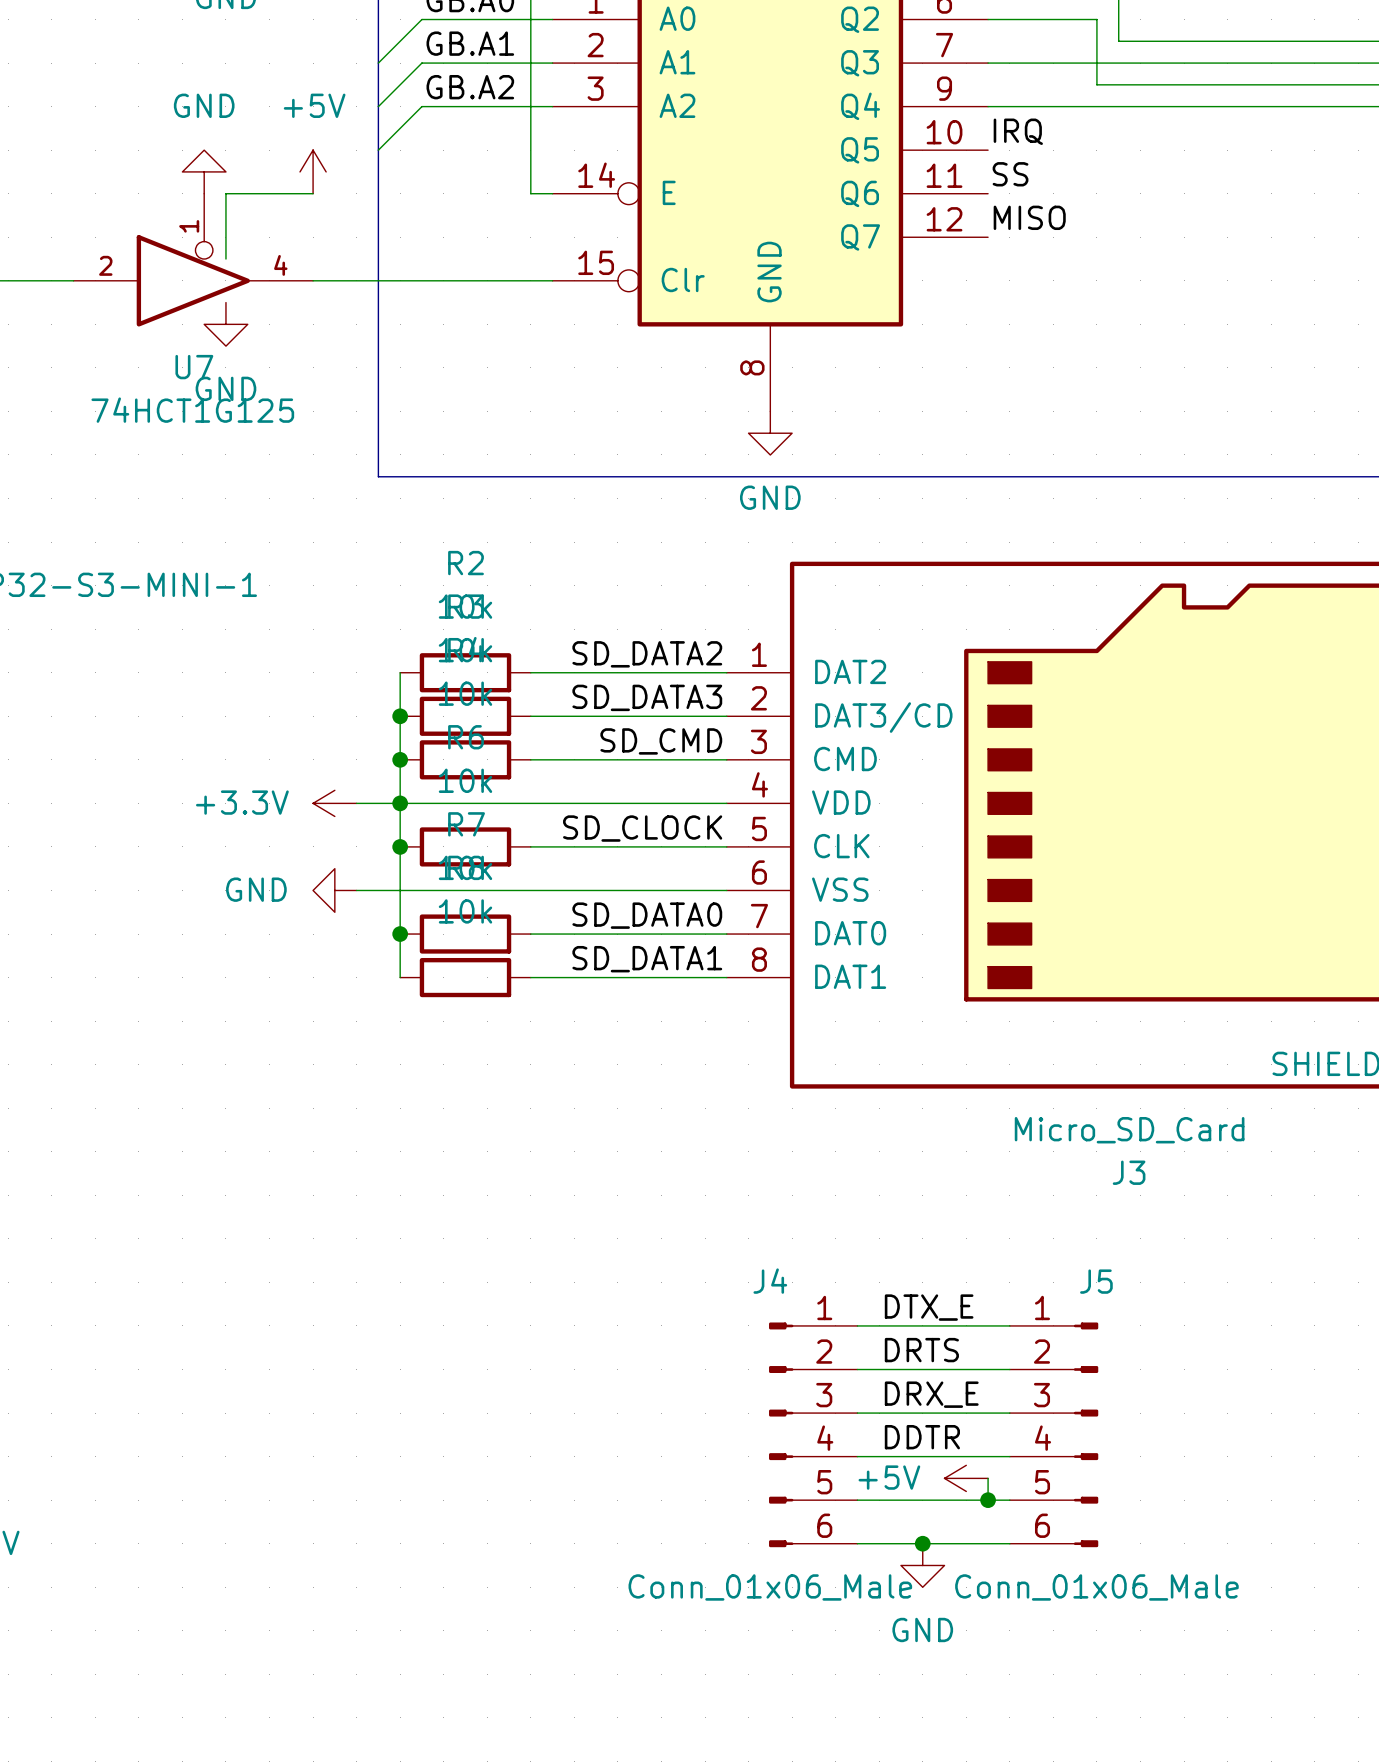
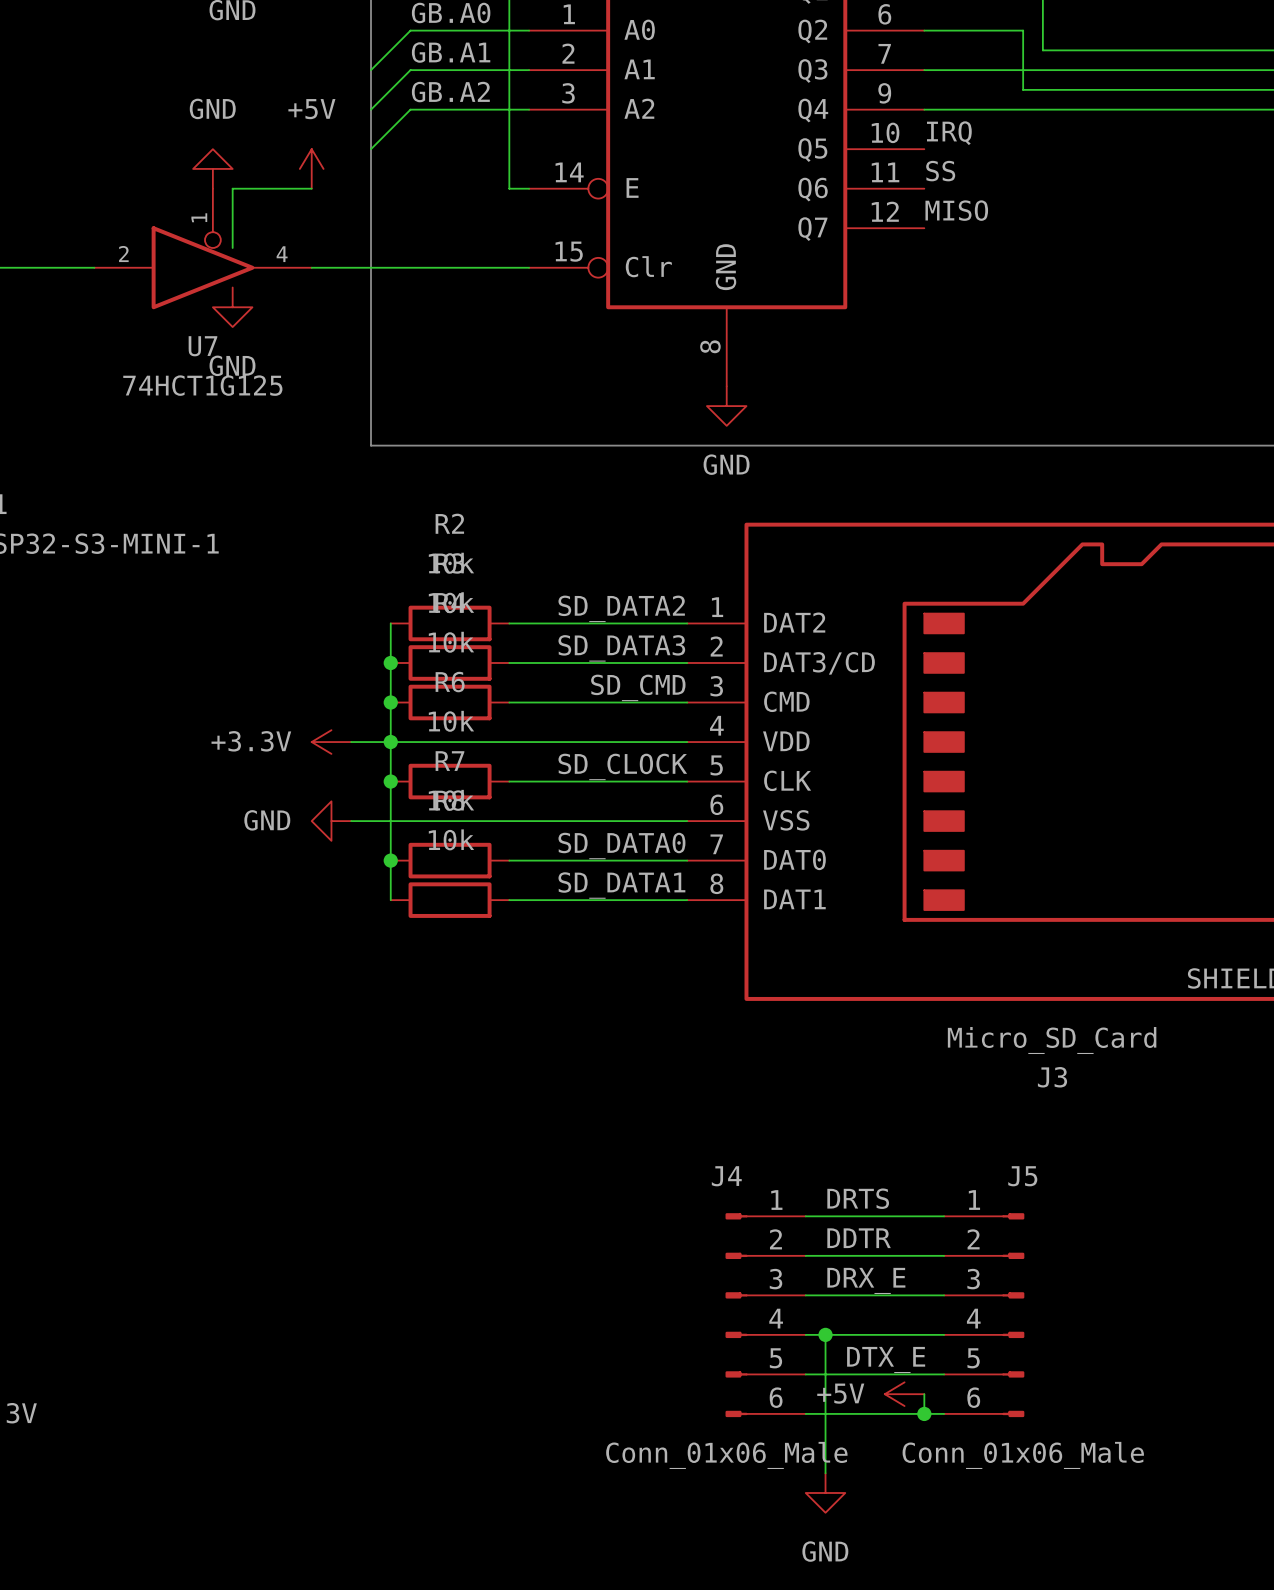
label: DTX_E (929, 1307) -> DRTS (858, 1198)
label: DRTS (921, 1350) -> DDTR (859, 1238)
label: DDTR (922, 1437) -> none
wire: none -> (825, 1334) (825, 1473)
junction: none -> (825, 1334)
power symbol position: +5V (966, 1478) -> +5V (904, 1394)
wire: (988, 1478) (988, 1500) -> (924, 1394) (924, 1413)
label: none -> DTX_E (886, 1359)
junction: (988, 1500) -> none
junction: (922, 1543) -> none
junction: none -> (924, 1413)
power symbol position: GND (922, 1565) -> GND (825, 1492)

